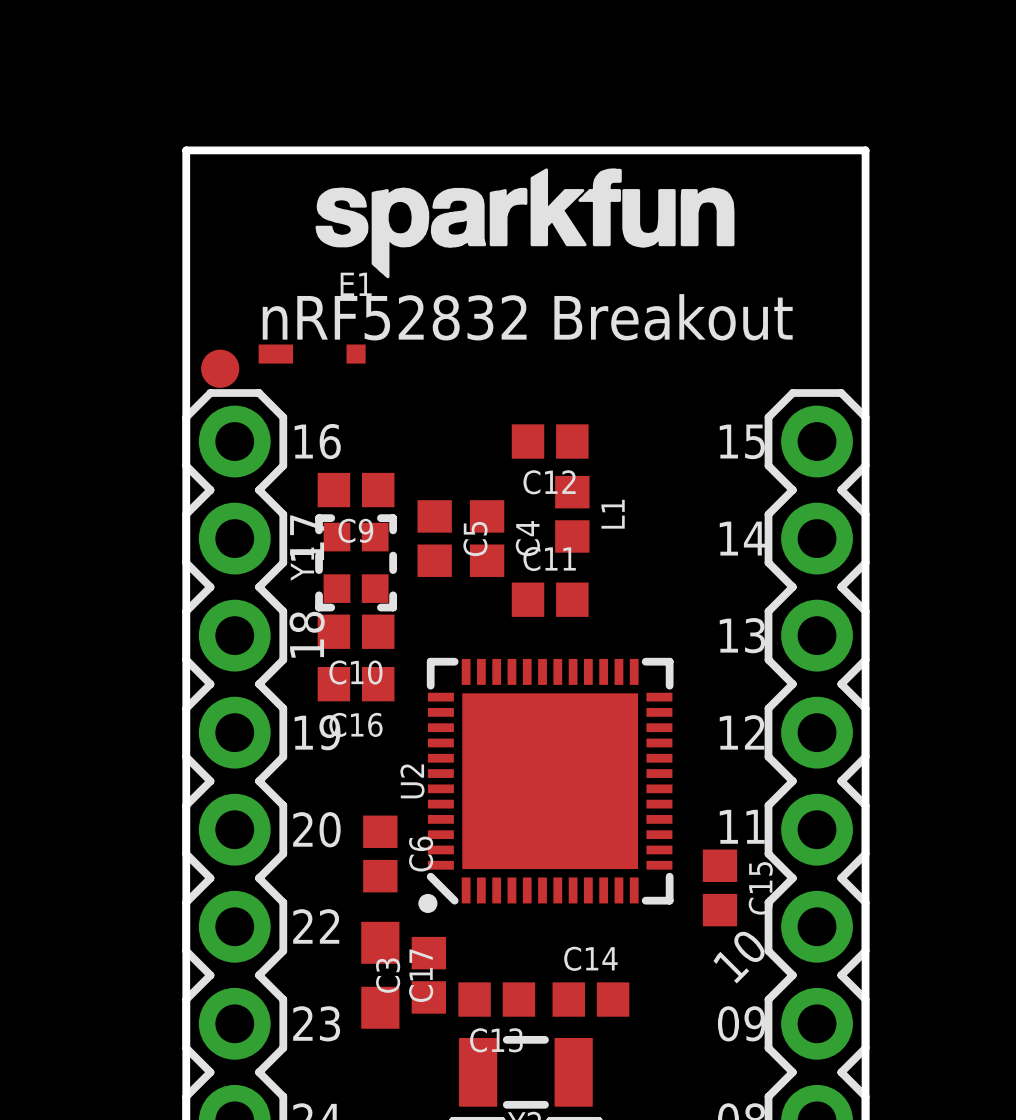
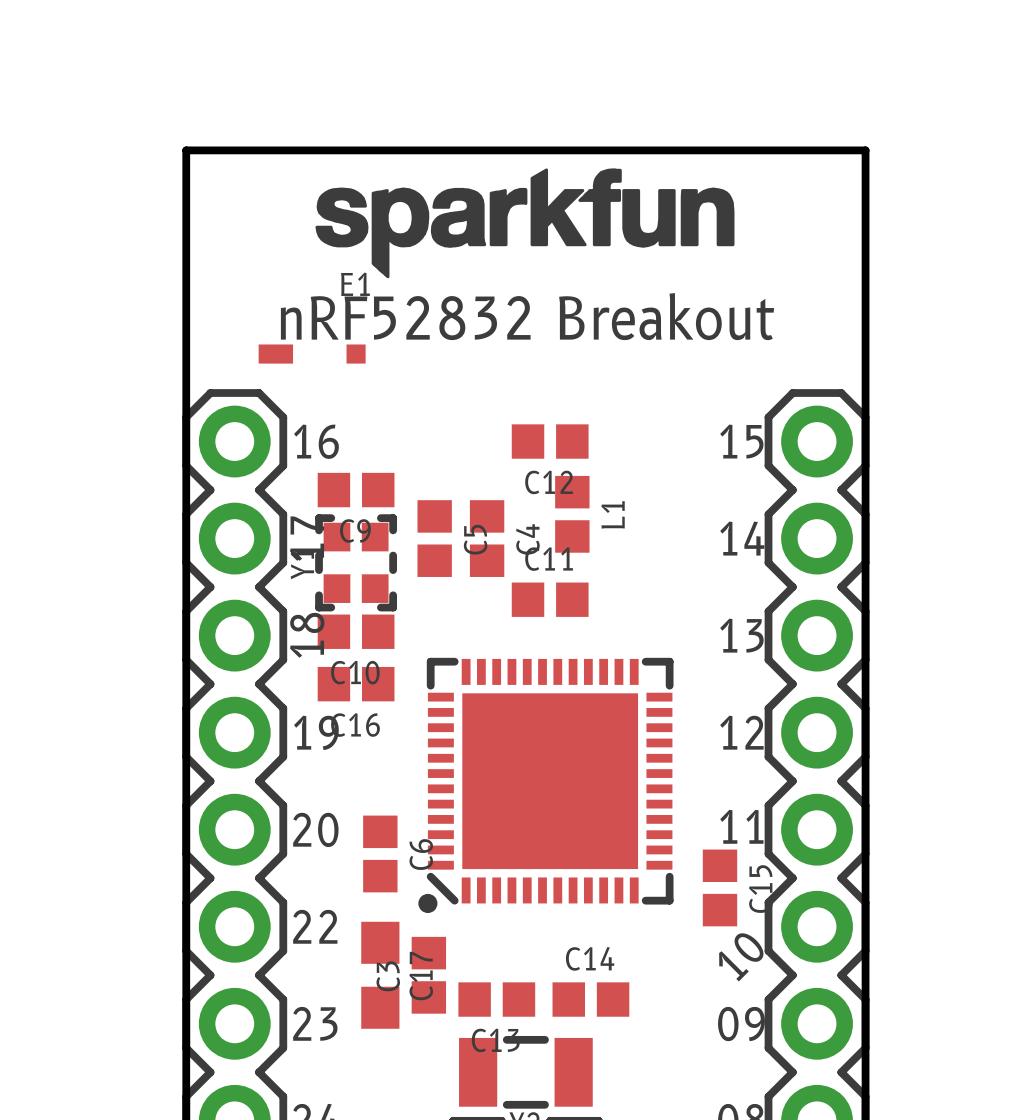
part: (220, 368) -> none
U2 name: U2 (412, 781) -> none

